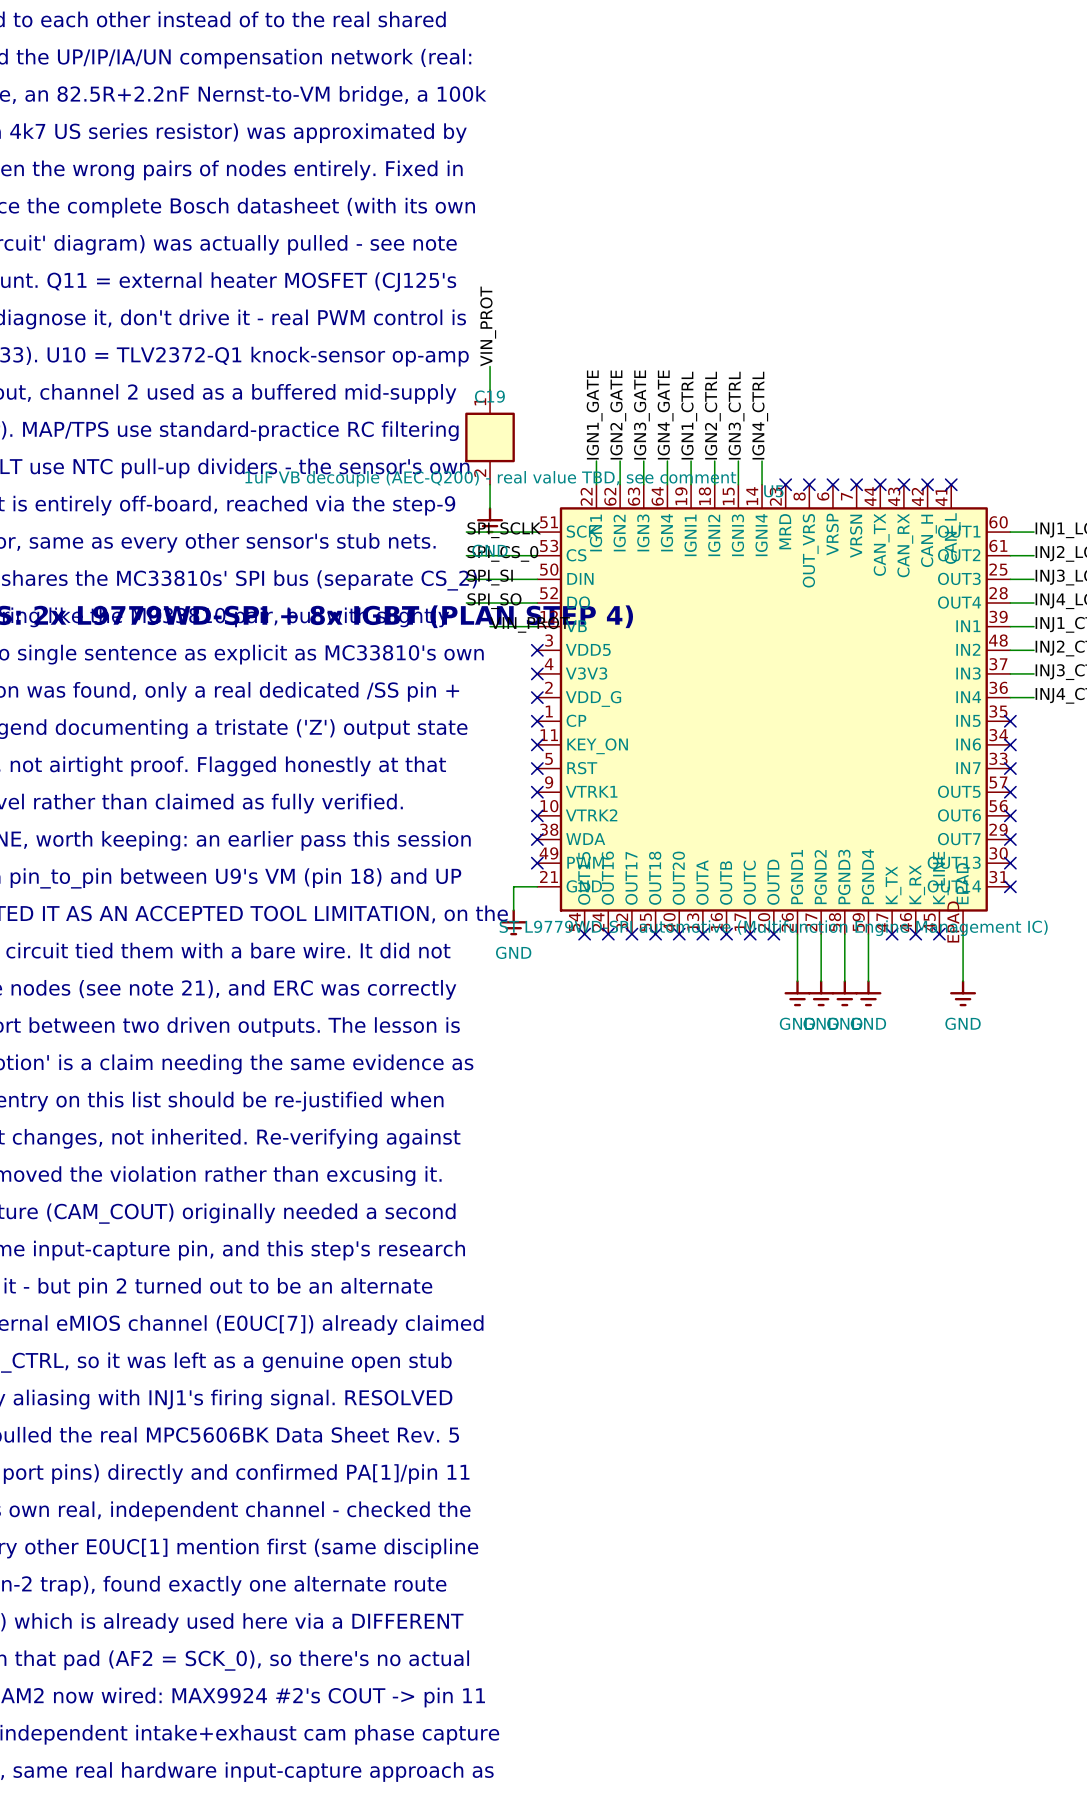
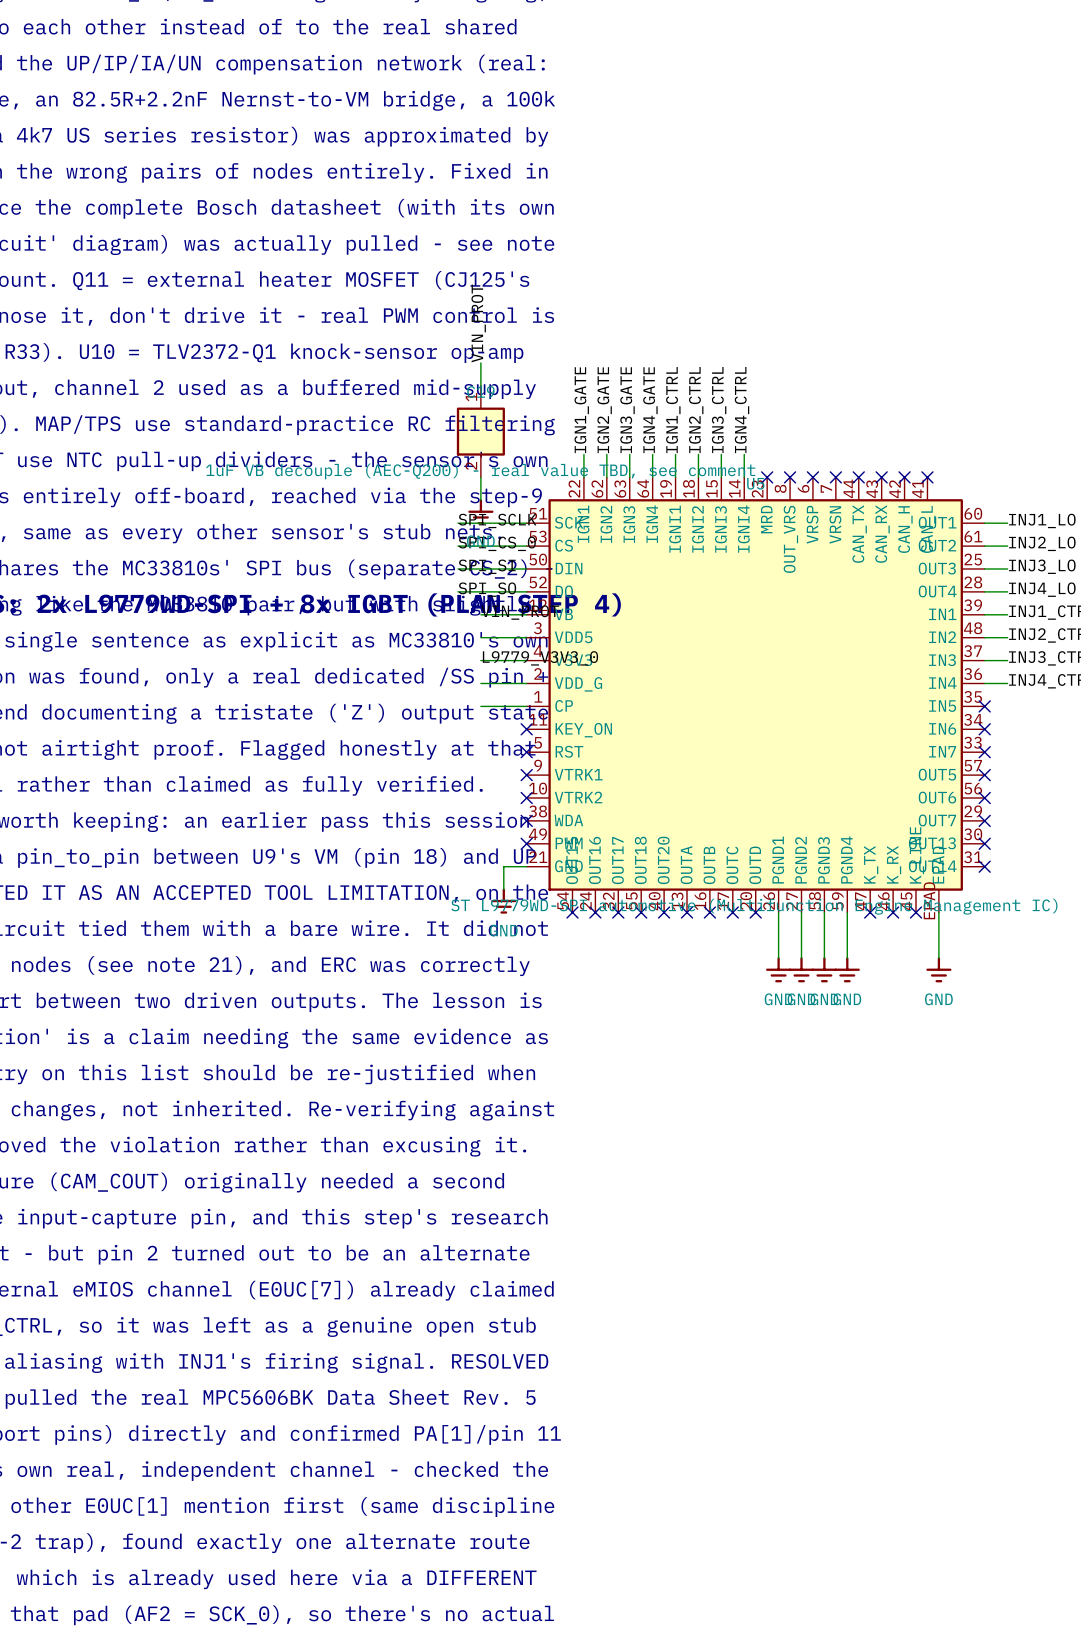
wire: none -> (480, 637) (526, 637)
no-connect mark: (537, 650) -> none
label: none -> L9779_V3V3_0 (540, 658)
wire: none -> (480, 660) (526, 660)
no-connect mark: (537, 673) -> none
wire: none -> (480, 683) (526, 683)
no-connect mark: (537, 697) -> none
wire: none -> (480, 706) (526, 706)
no-connect mark: (537, 721) -> none

